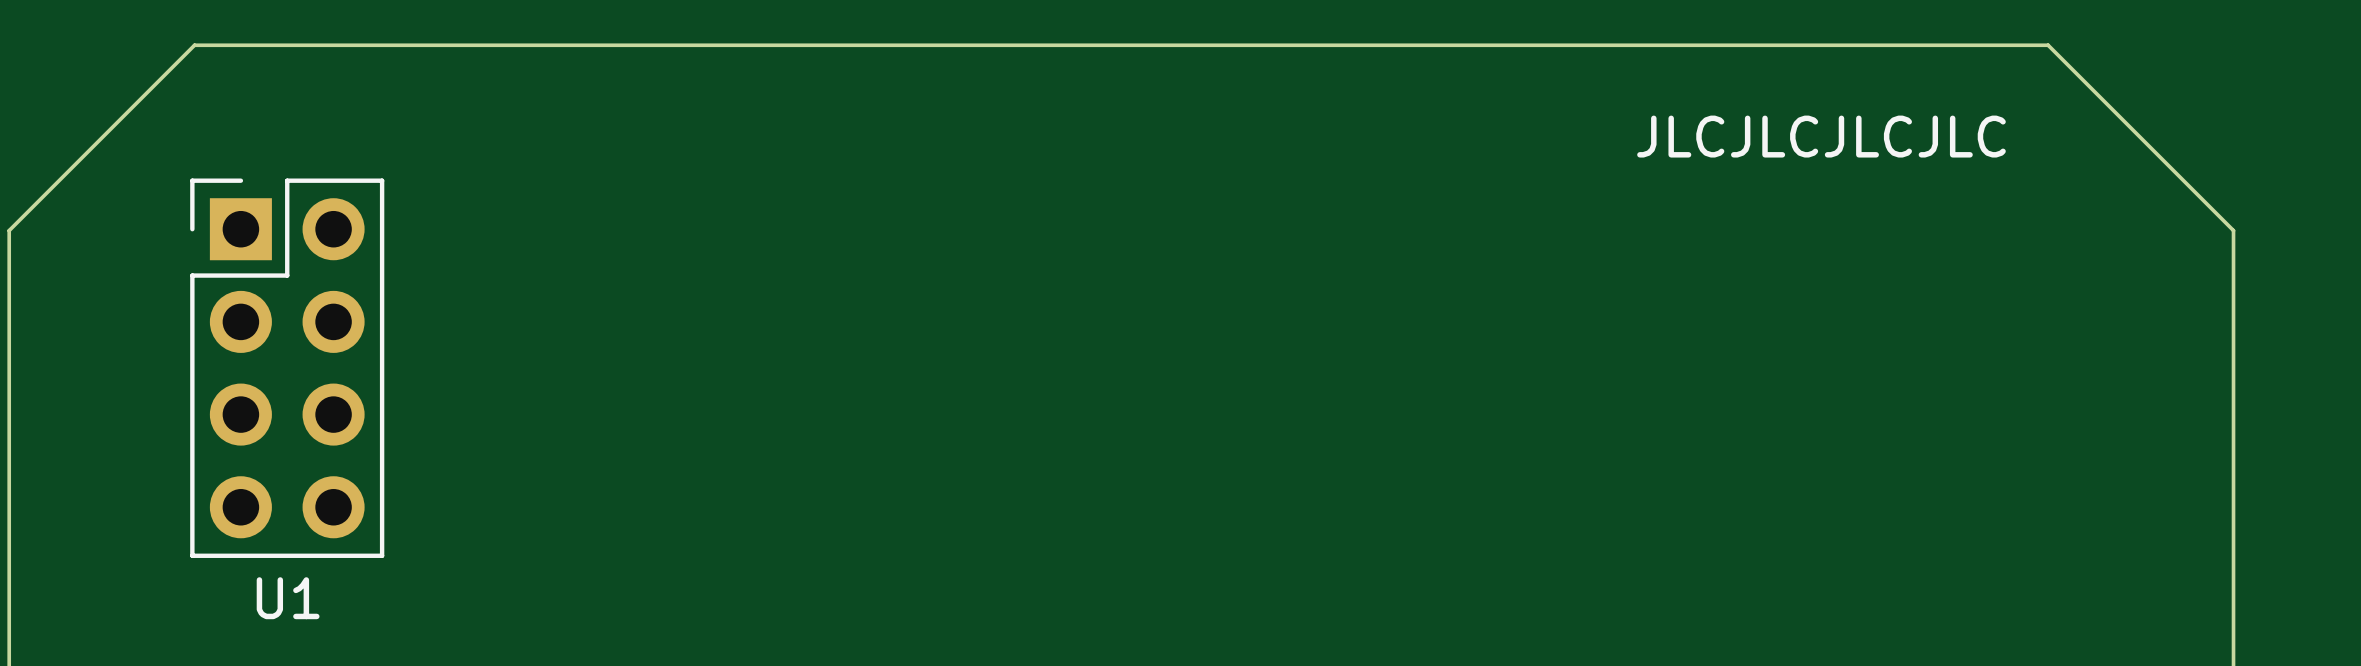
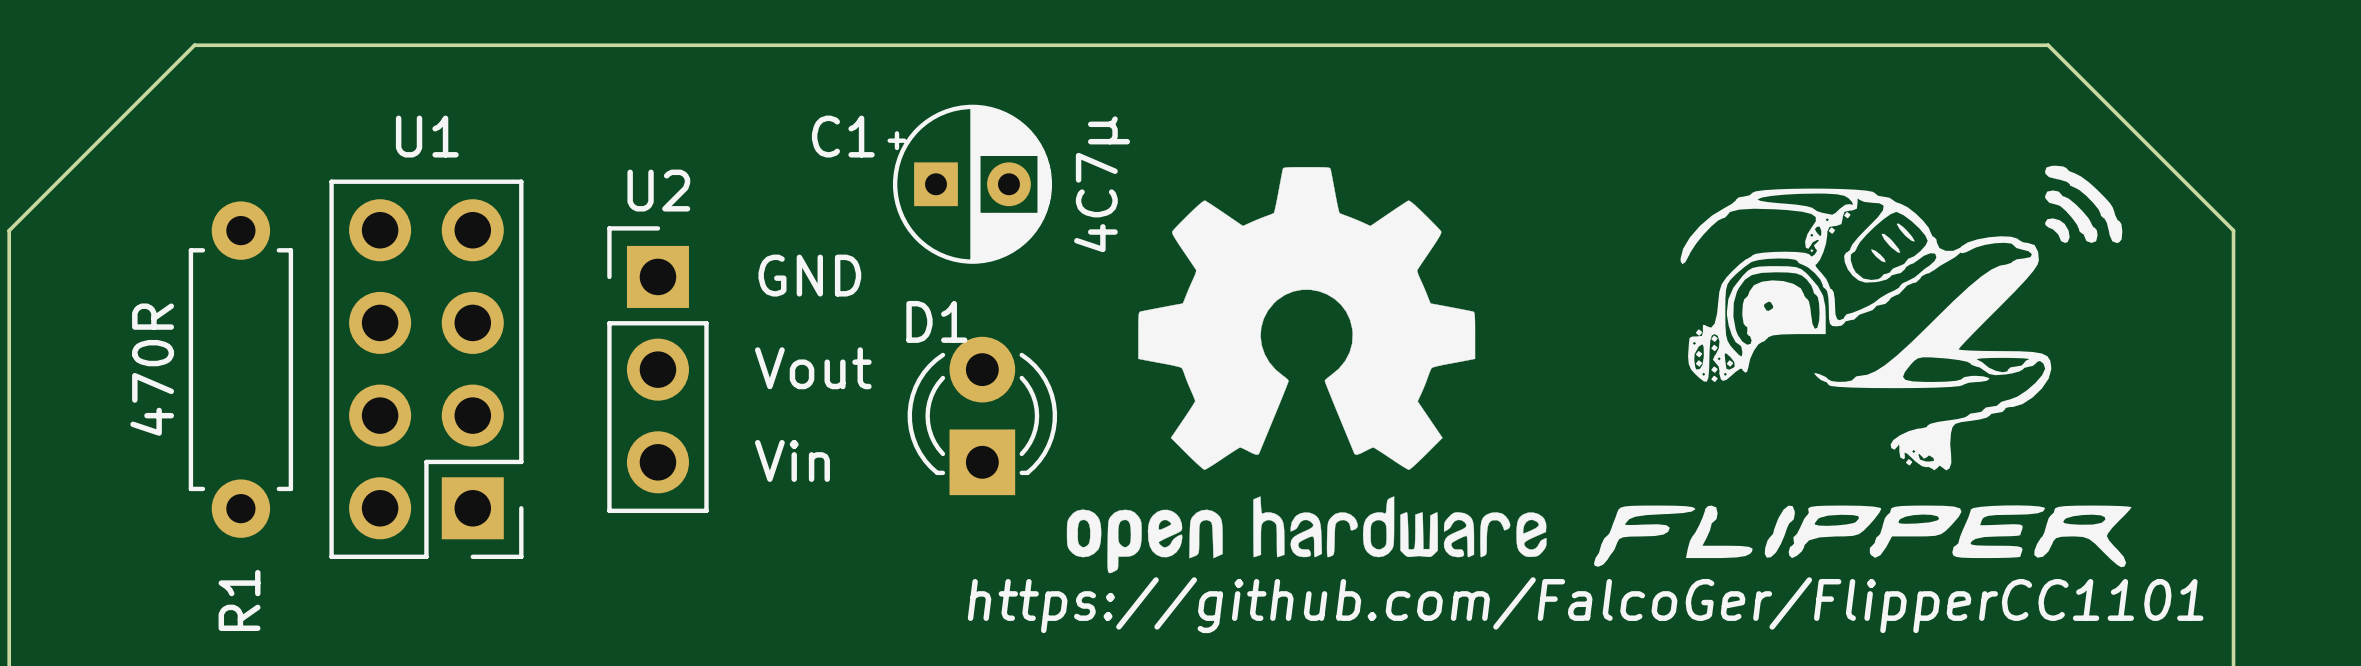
text: JLCJLCJLCJLC (1821, 136) -> none
drawing: none -> [1594, 165, 2132, 568]
drawing: none -> [1066, 167, 1547, 574]
C1: none -> 4C7µ (969, 184)
text: none -> GND (809, 275)
U1 rotation: 0° (287, 368) -> 180° (426, 369)
text: none -> Vout (813, 368)
R1: none -> 470R (240, 369)
U2: none -> (657, 369)
D1: none -> (982, 415)
text: none -> Vin (792, 460)
text: none -> https://github.com/FalcoGer/FlipperCC1101 (1585, 605)

